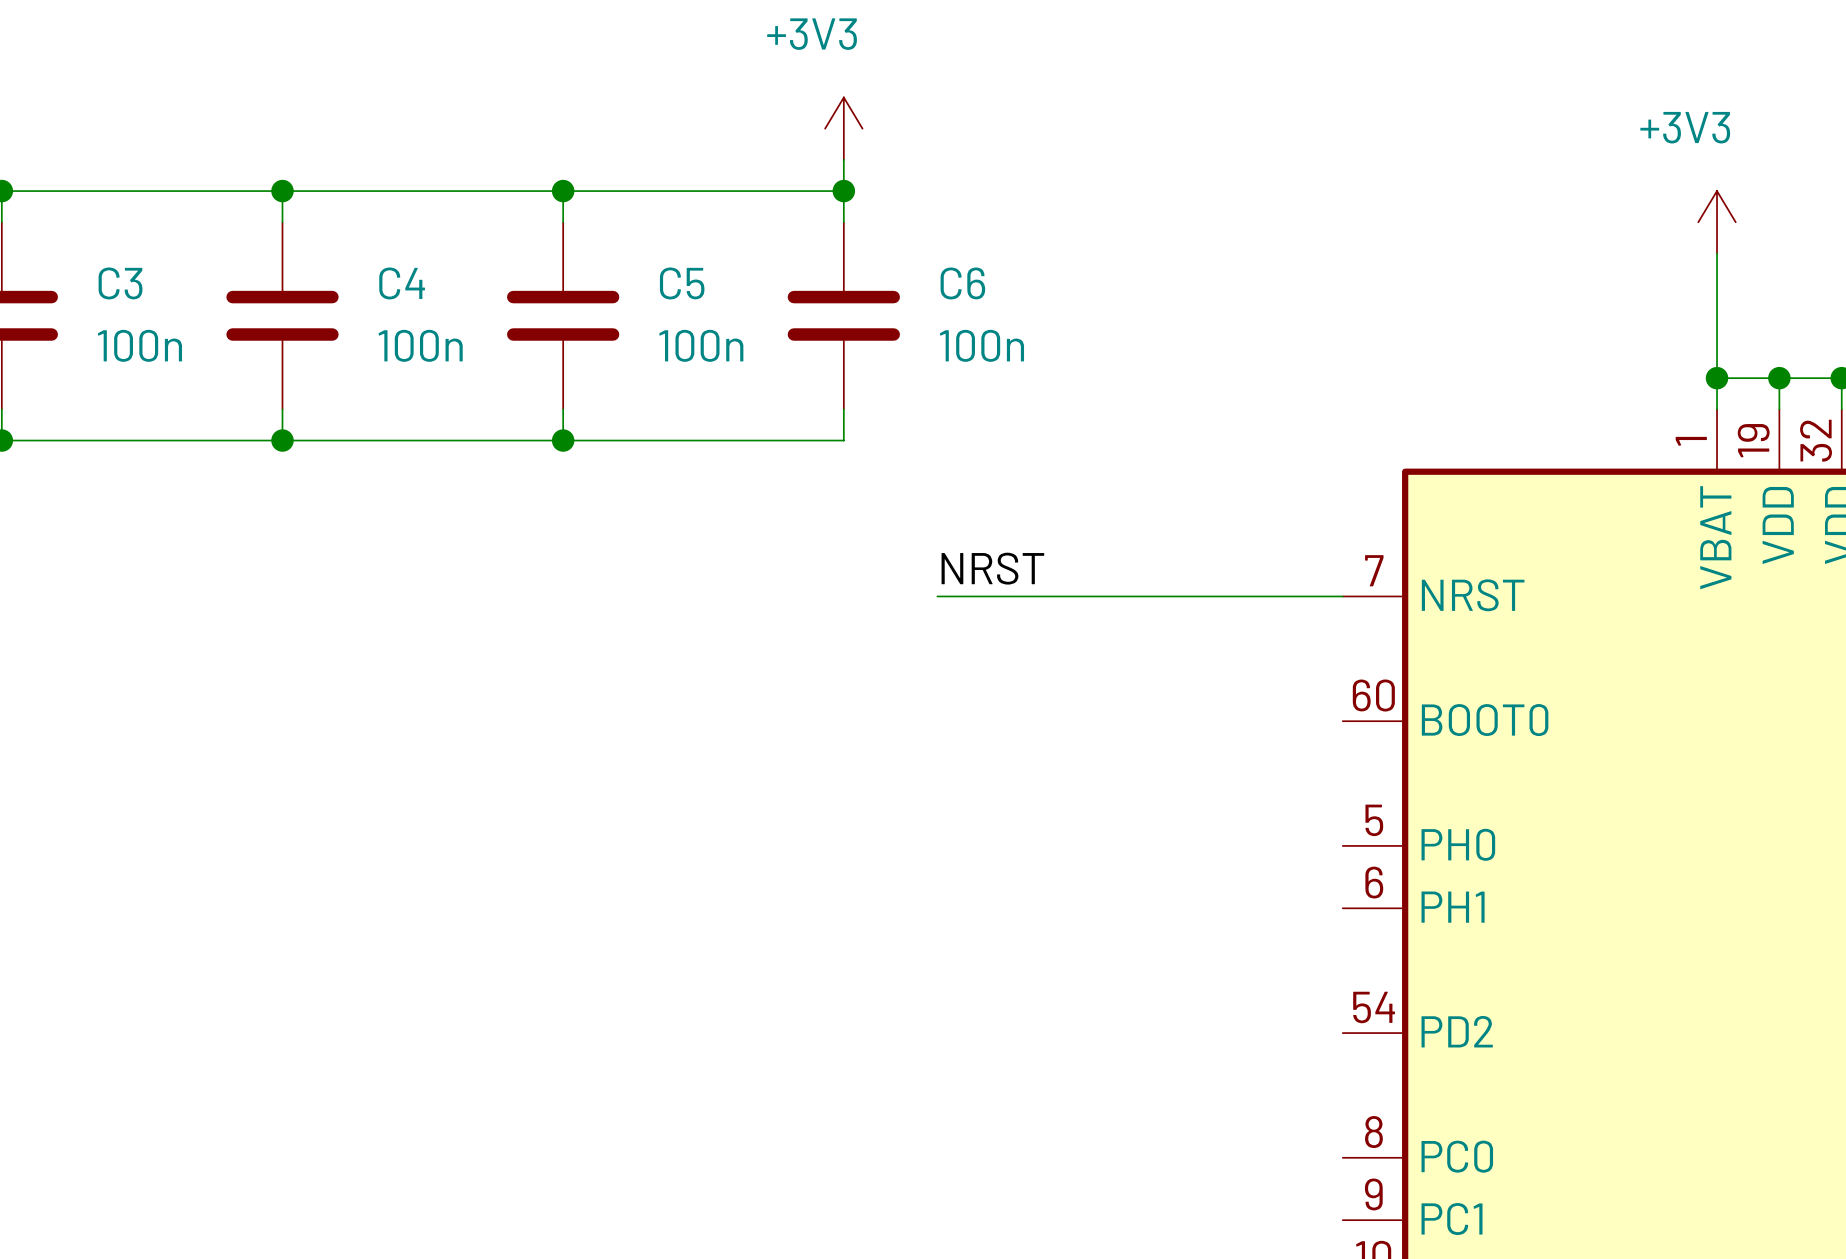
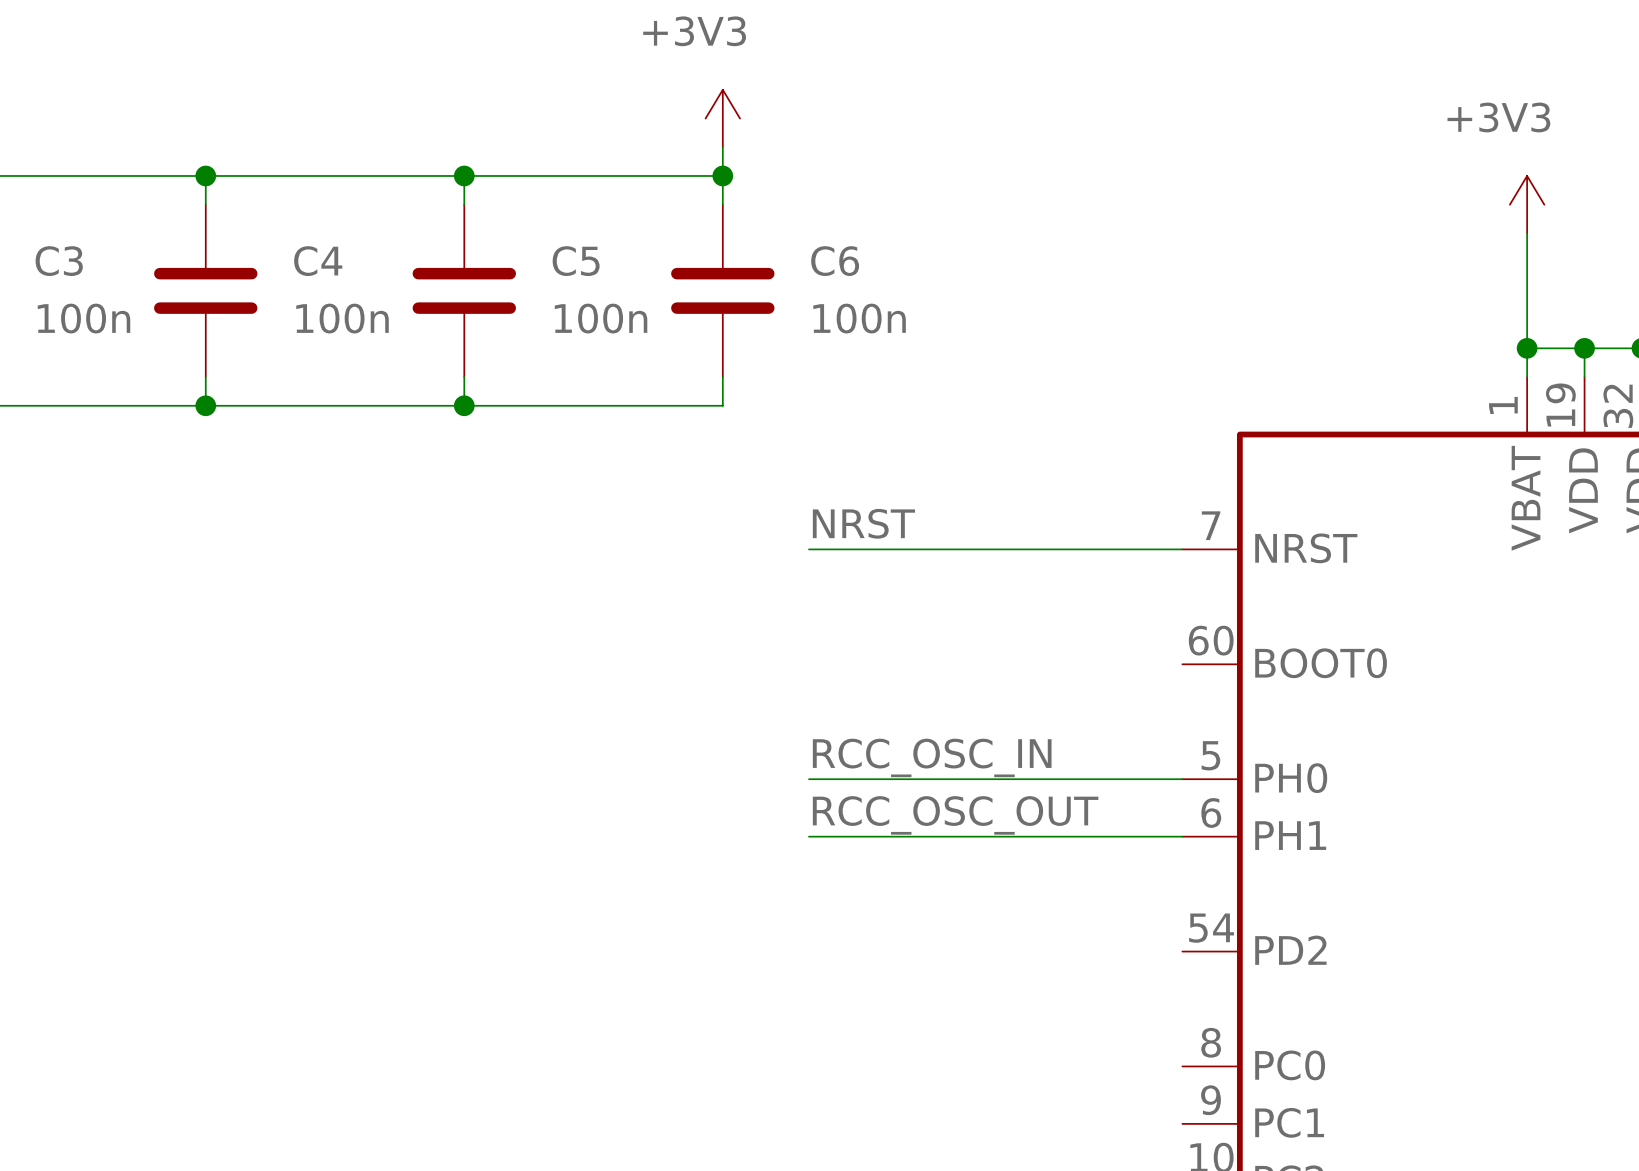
label: none -> RCC_OSC_IN (932, 757)
wire: none -> (808, 779) (1182, 779)
label: none -> RCC_OSC_OUT (955, 815)
wire: none -> (808, 836) (1182, 836)

